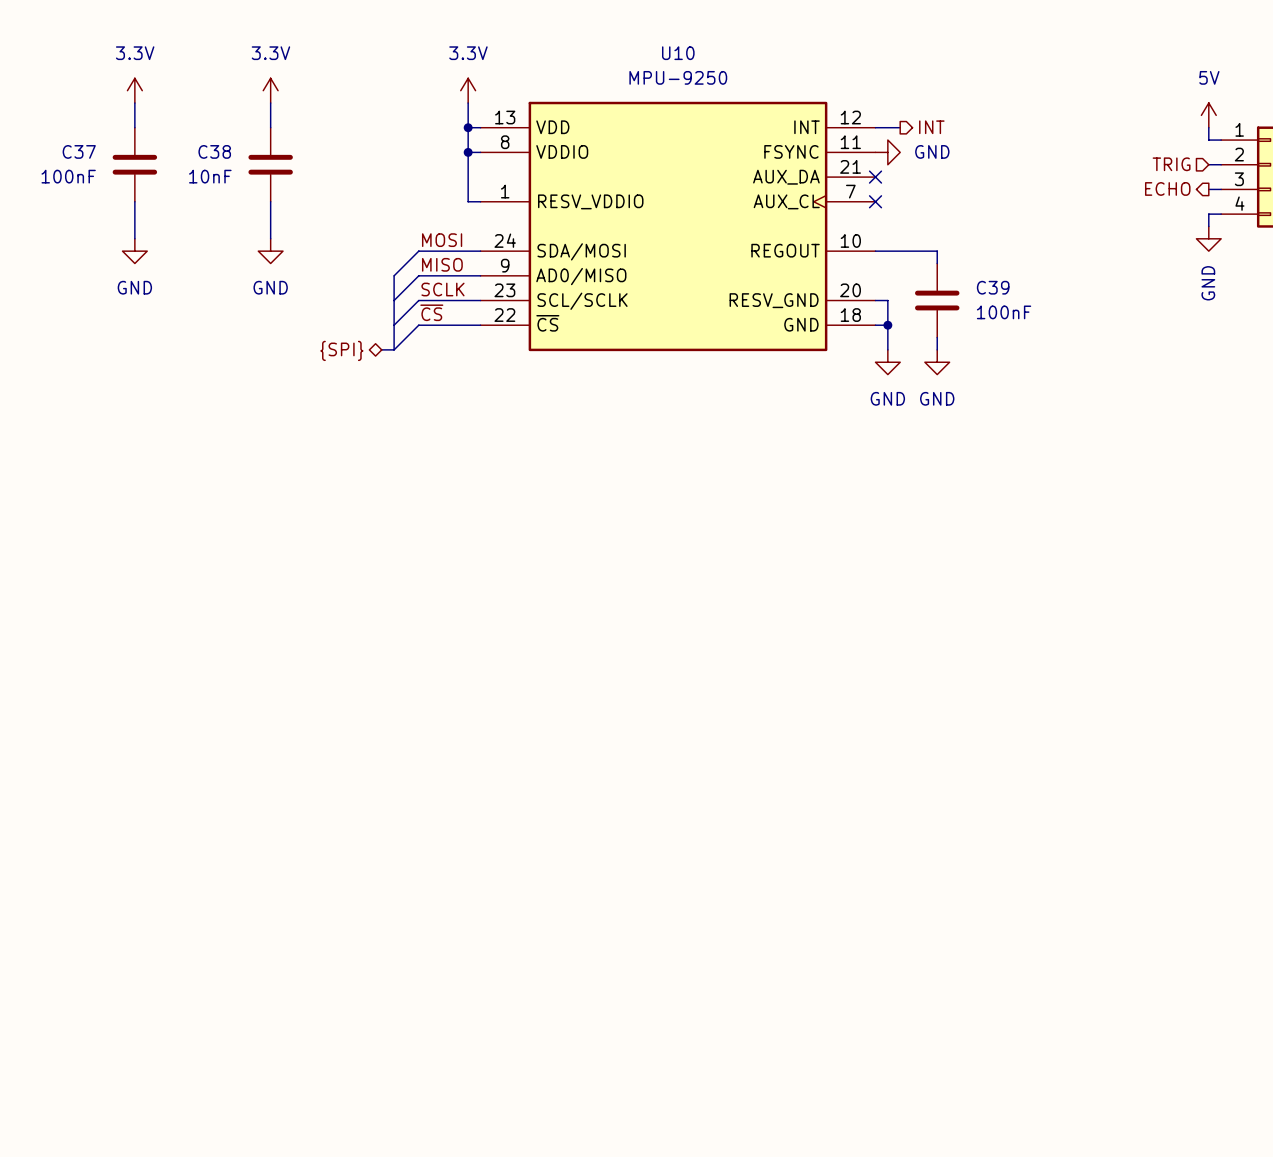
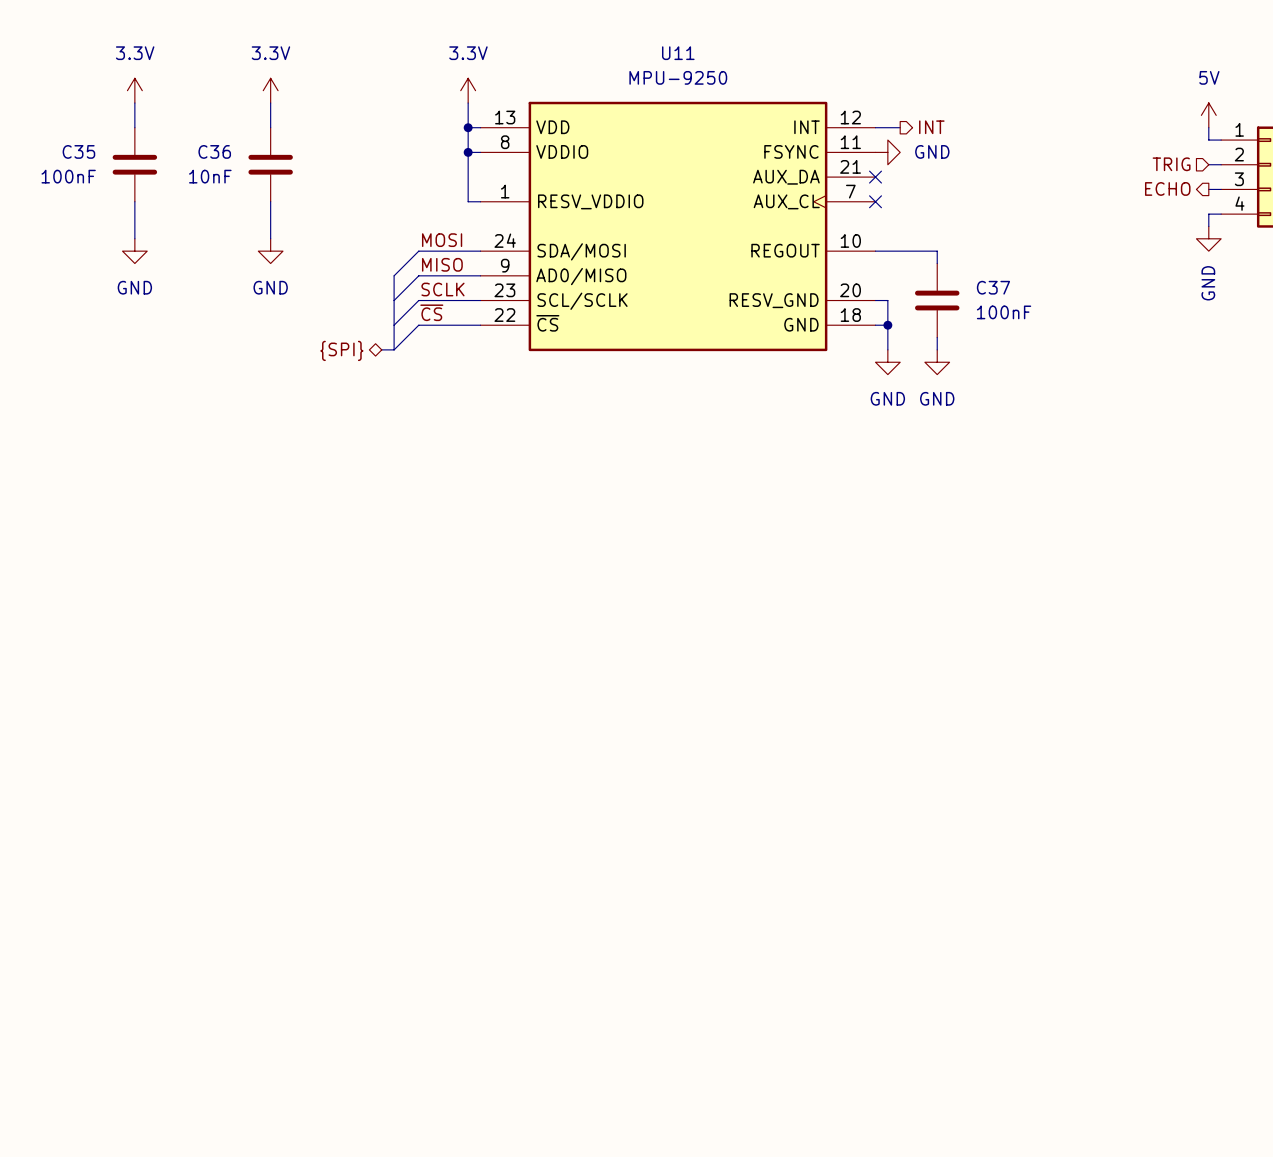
U10 name: U10 (678, 53) -> U11 (678, 53)
C37 name: C37 (79, 151) -> C35 (78, 151)
C38 name: C38 (214, 151) -> C36 (214, 151)
C39 name: C39 (993, 287) -> C37 (993, 287)

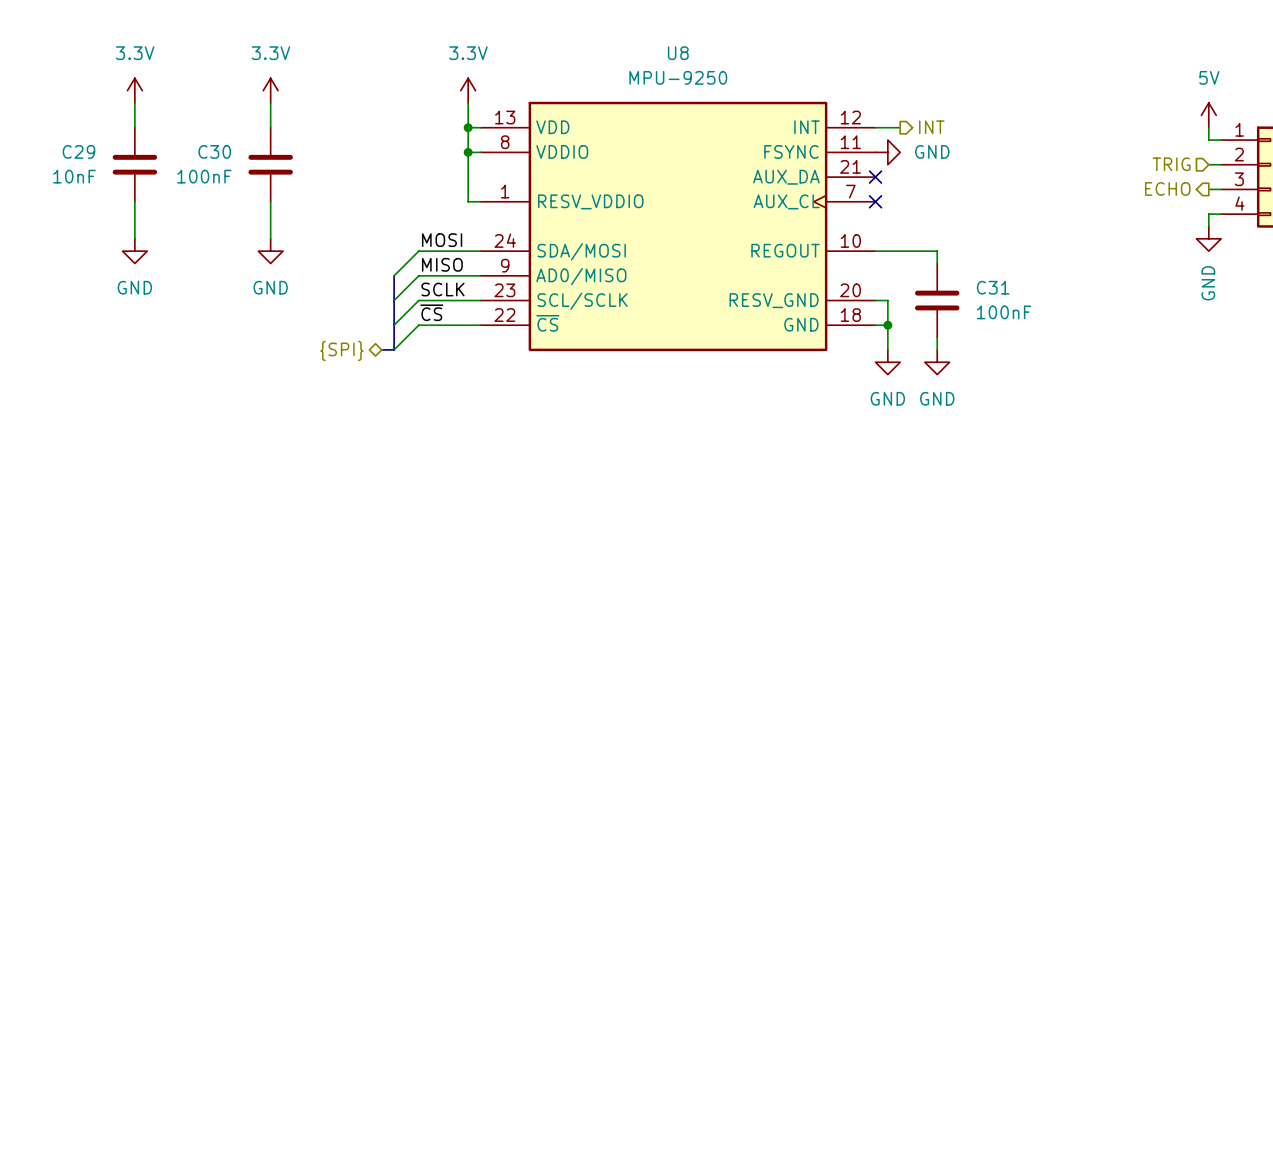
U11 name: U11 (678, 53) -> U8 (678, 53)
C35 name: C35 (78, 151) -> C29 (78, 151)
C36 name: C36 (214, 151) -> C30 (214, 151)
C35 value: 100nF (68, 176) -> 10nF (74, 176)
C36 value: 10nF (210, 176) -> 100nF (204, 176)
C37 name: C37 (993, 287) -> C31 (993, 287)

